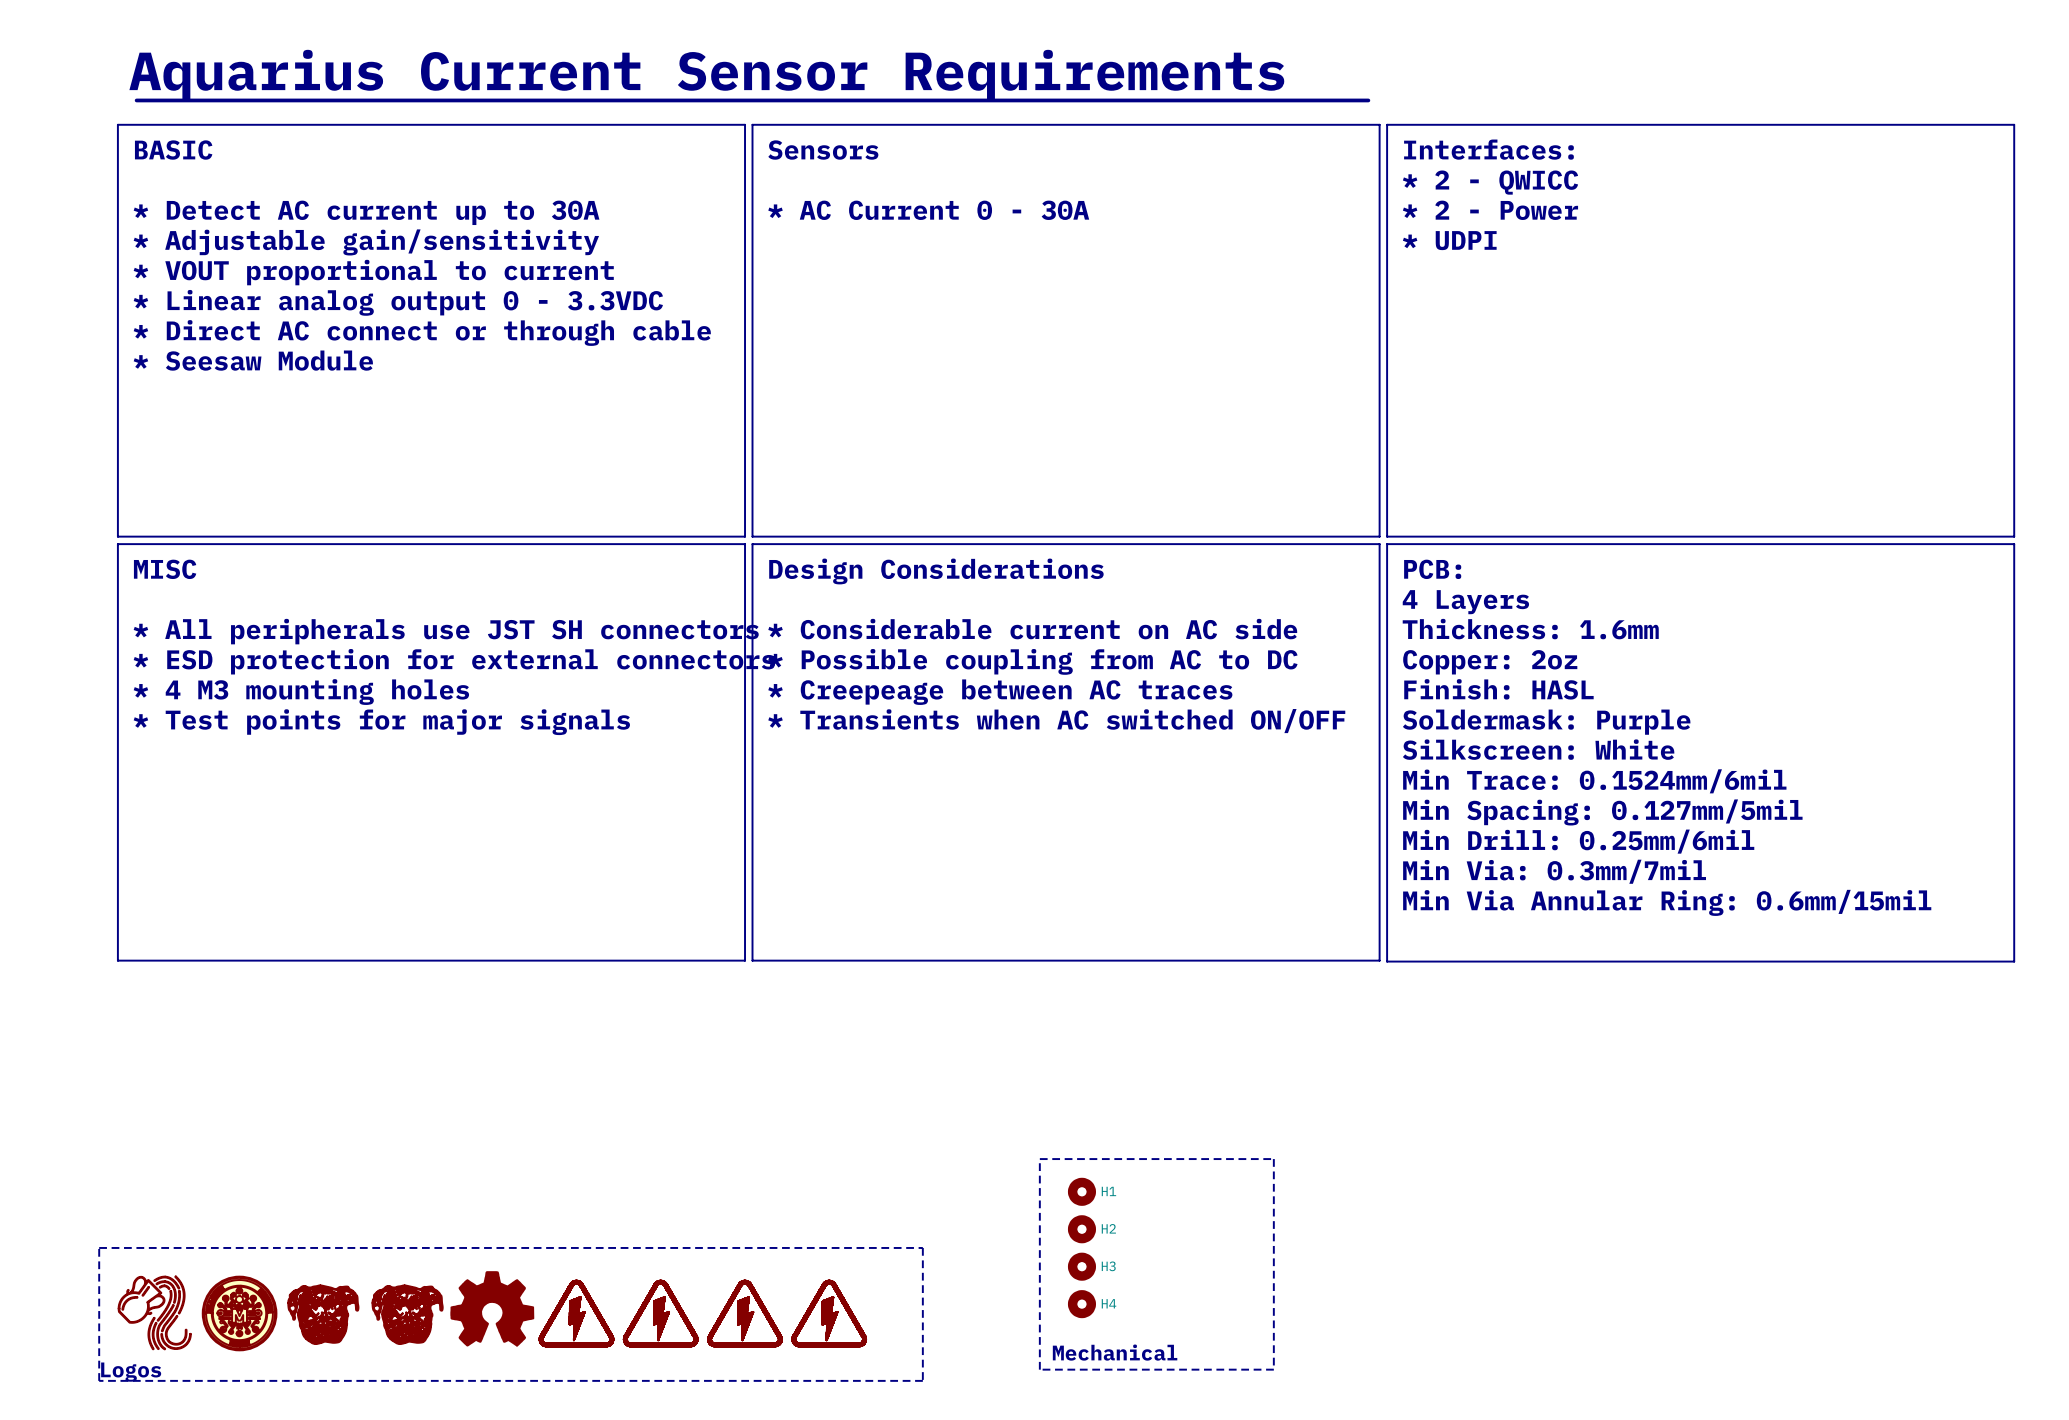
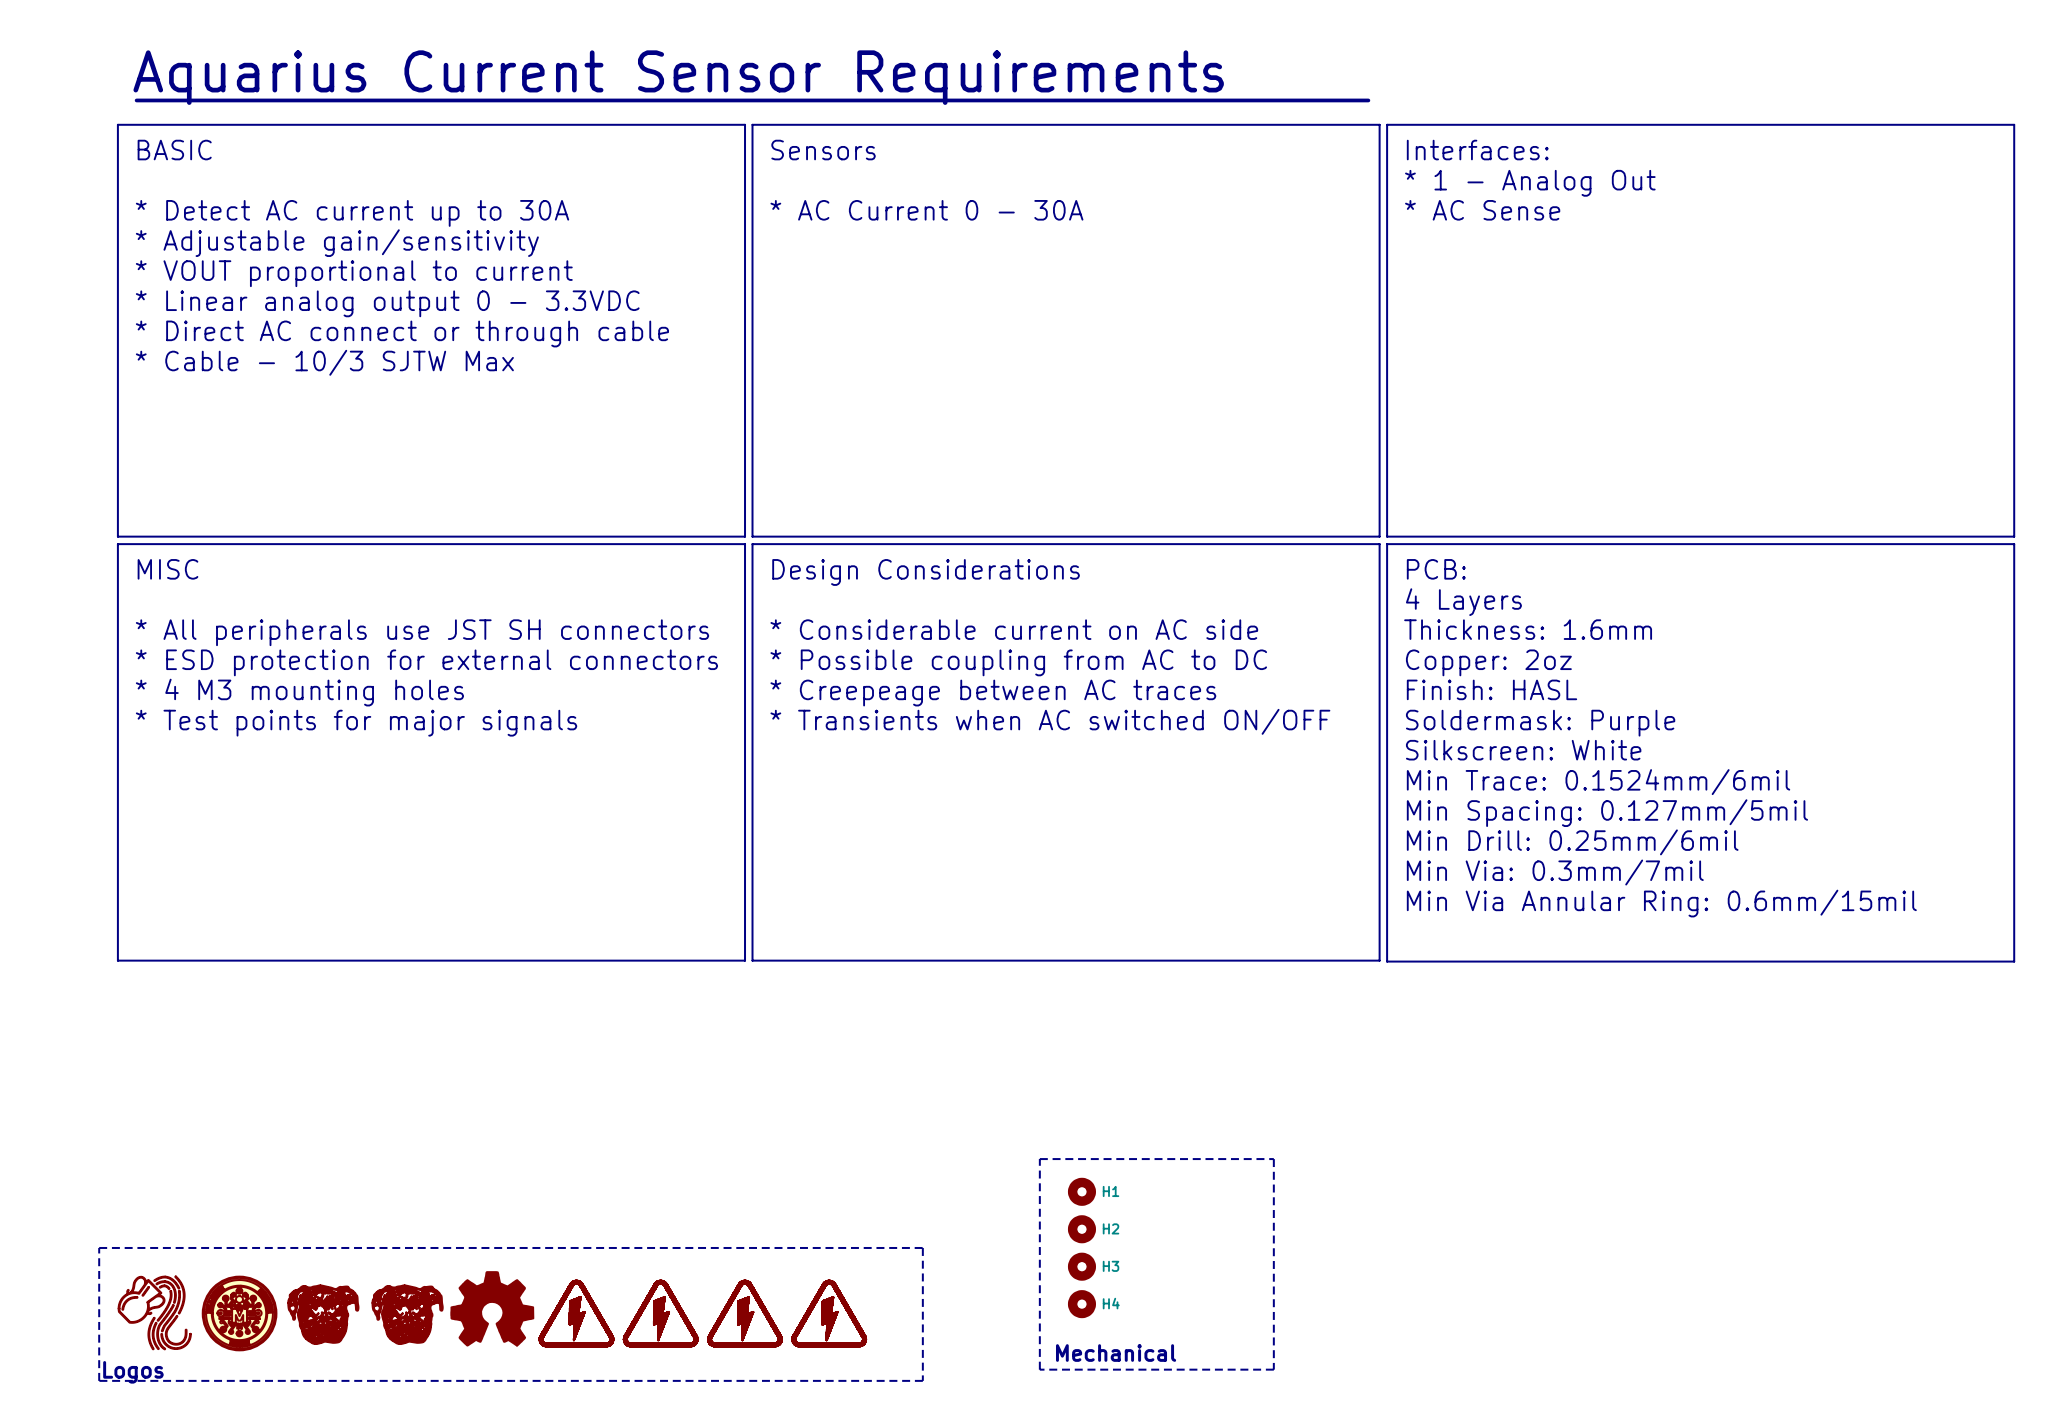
text: * 2 - QWICC (1490, 182) -> * 1 - Analog Out (1530, 183)
text: * 2 - Power (1490, 210) -> * AC Sense (1482, 210)
text: * UDPI (1449, 240) -> none
text: * Seesaw Module (253, 360) -> * Cable - 10/3 SJTW Max (324, 362)

